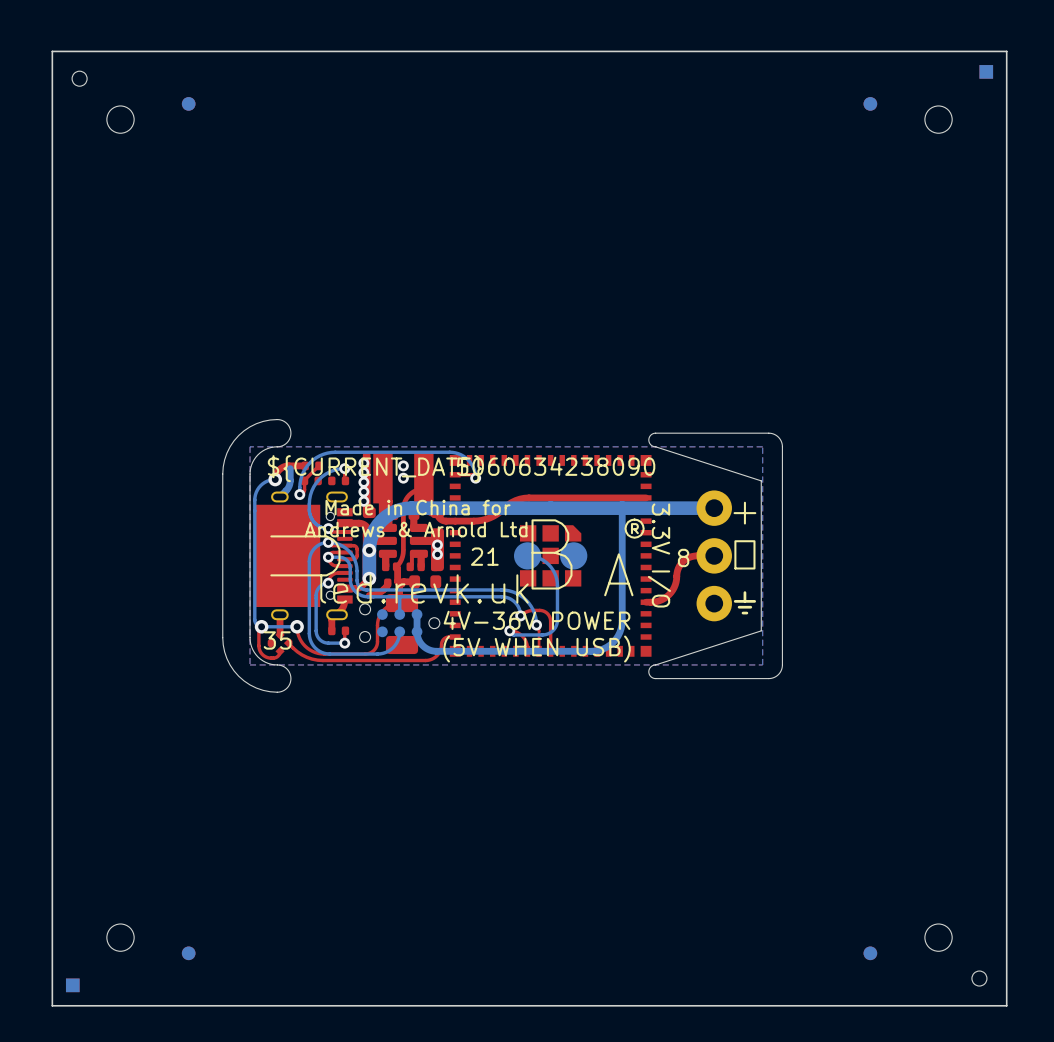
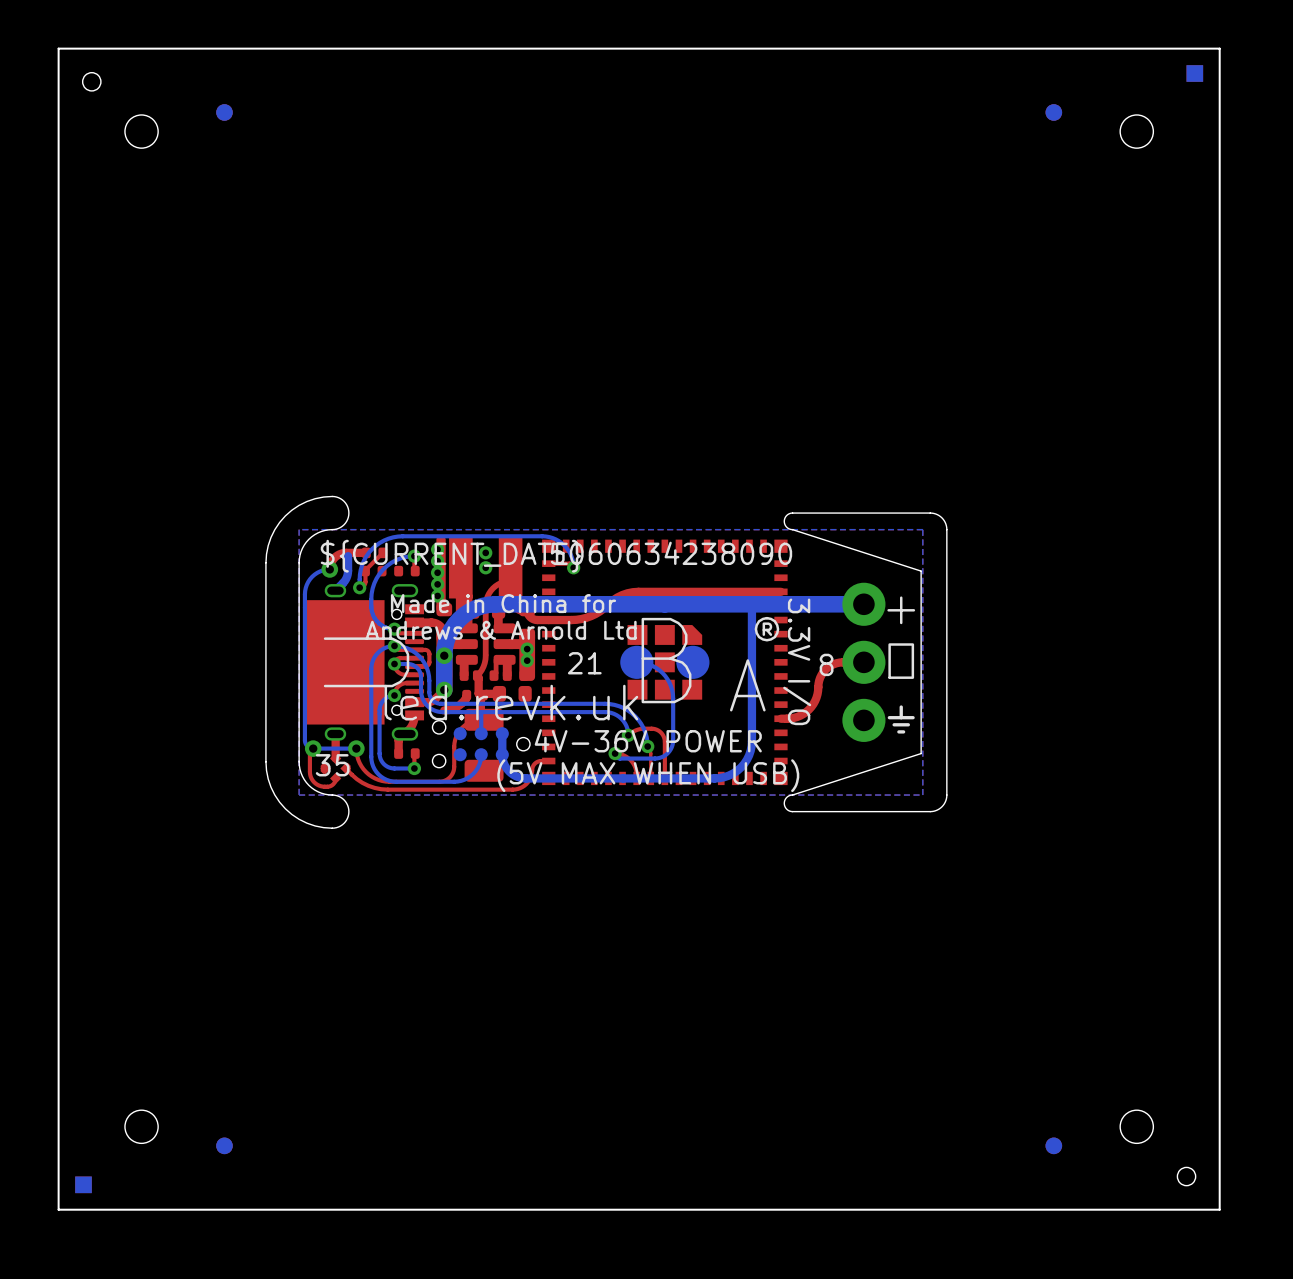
text: (5V WHEN USB) (537, 649) -> (5V MAX WHEN USB) (648, 775)

